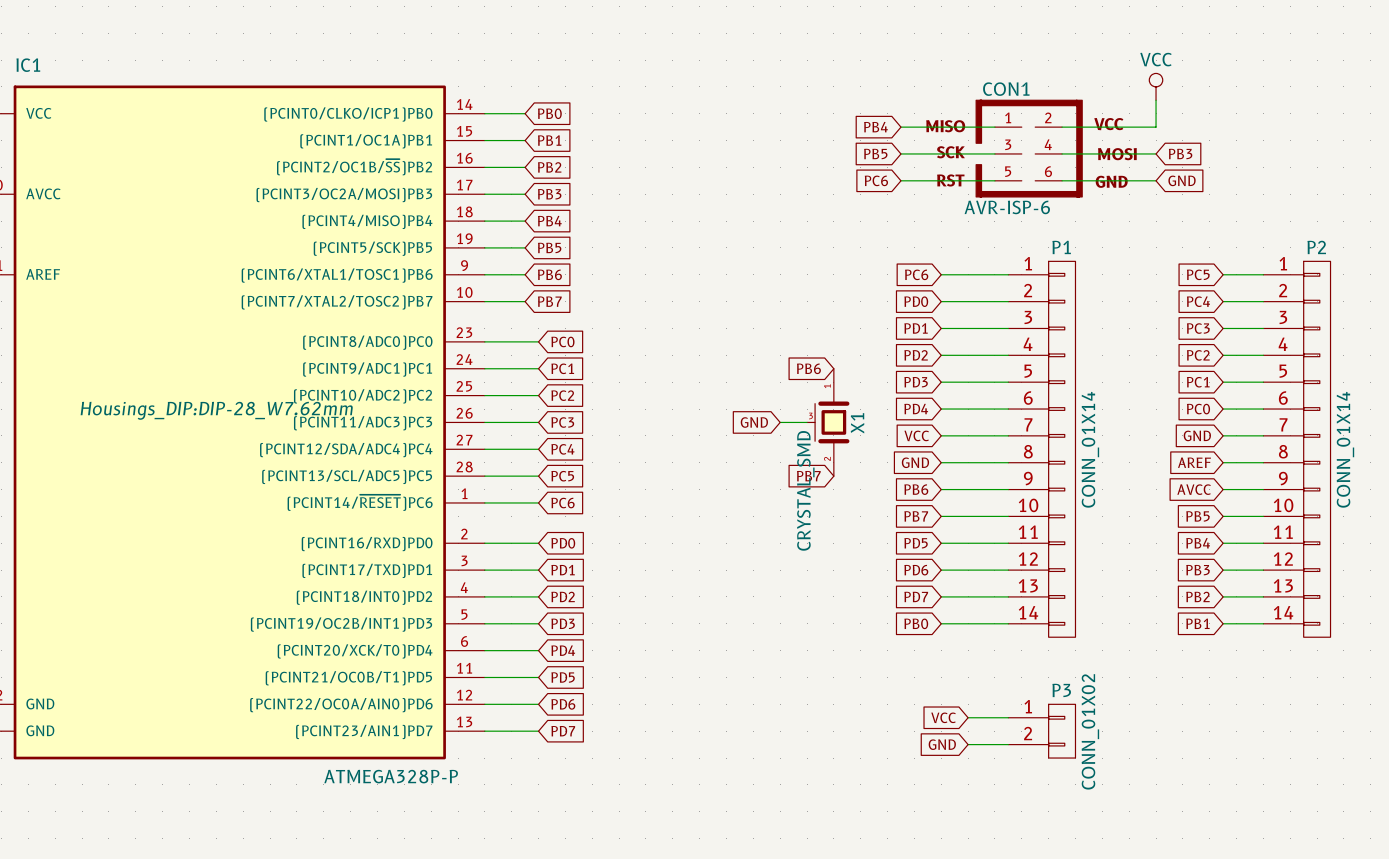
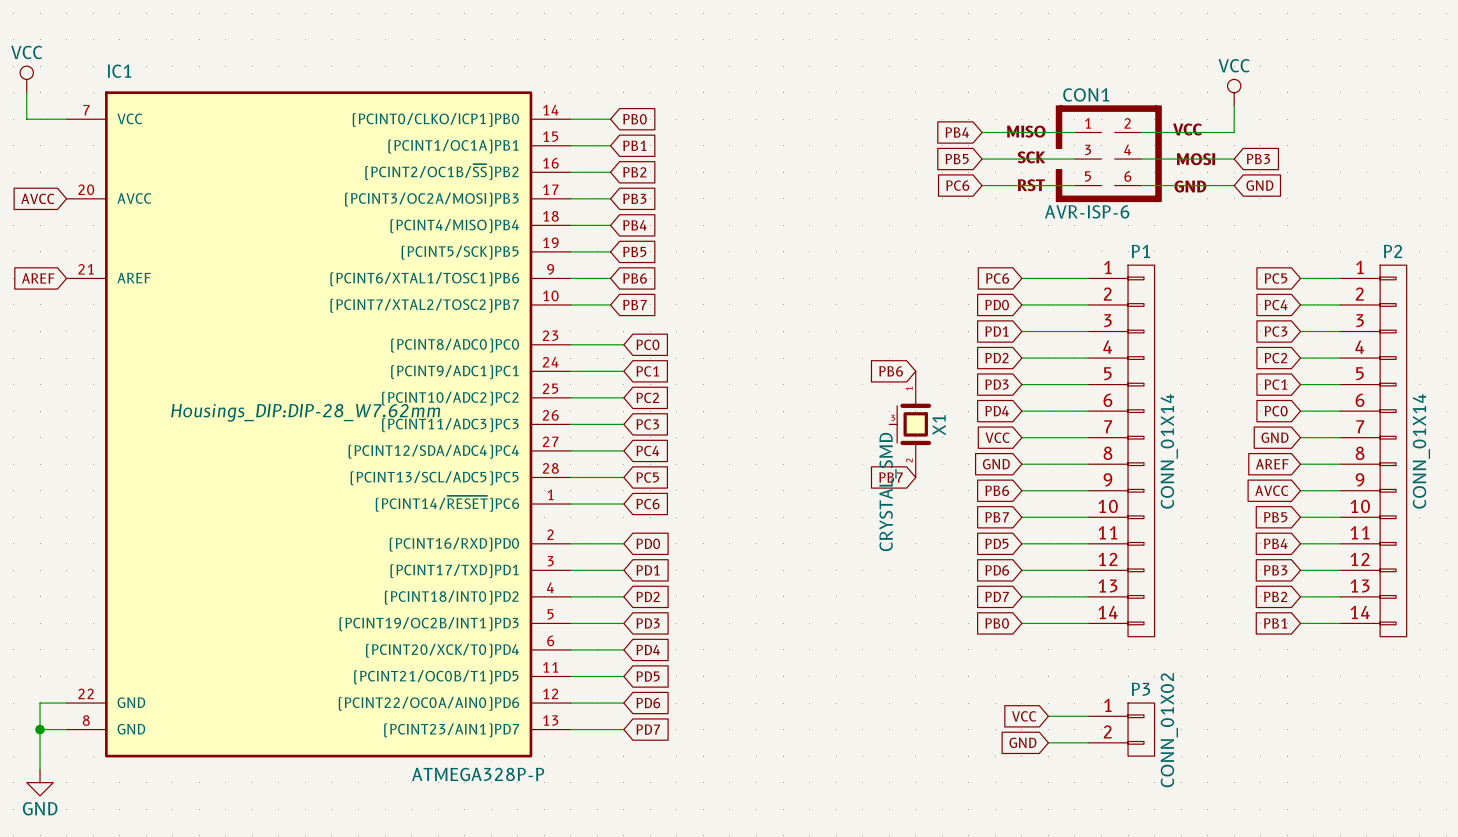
global label: GND (754, 422) -> none
wire: (780, 422) (807, 422) -> none

